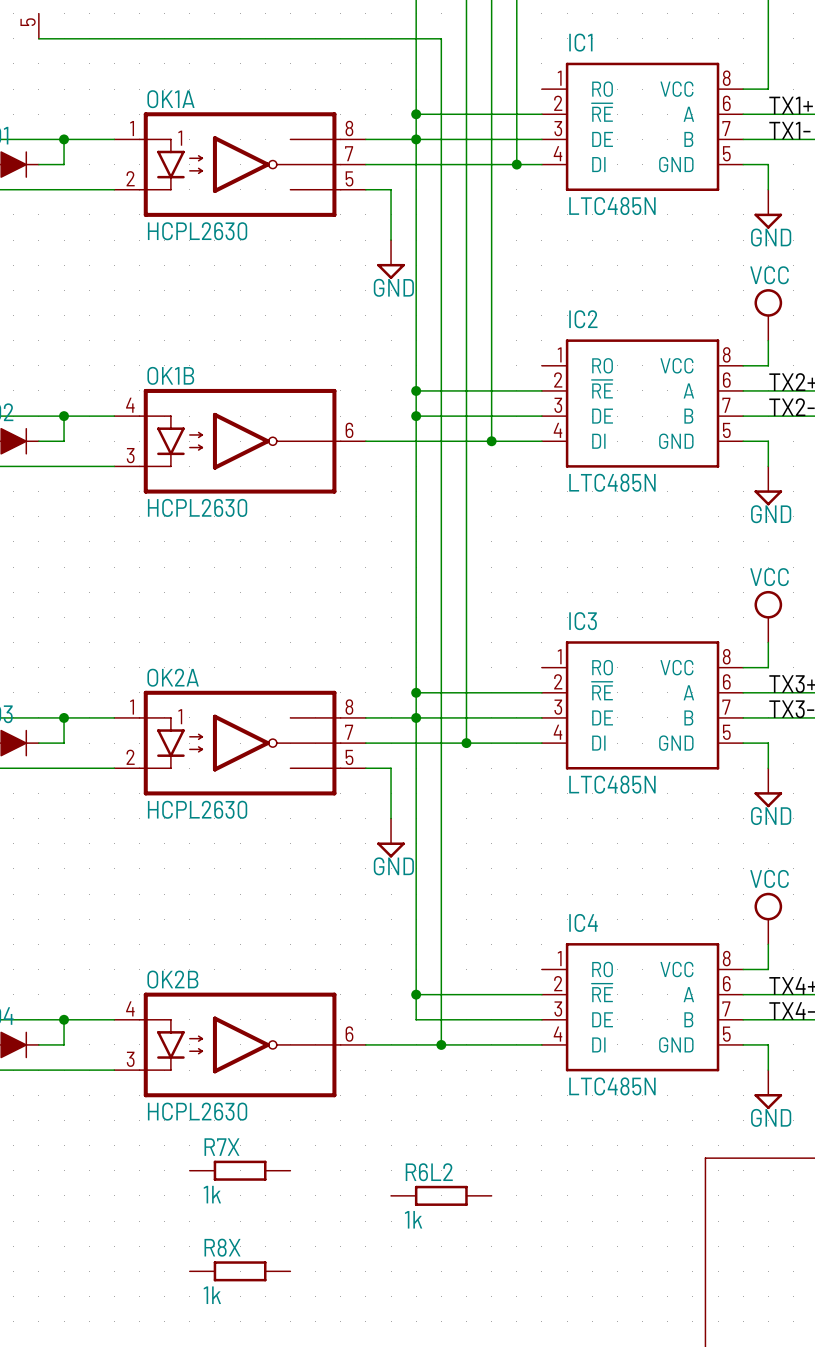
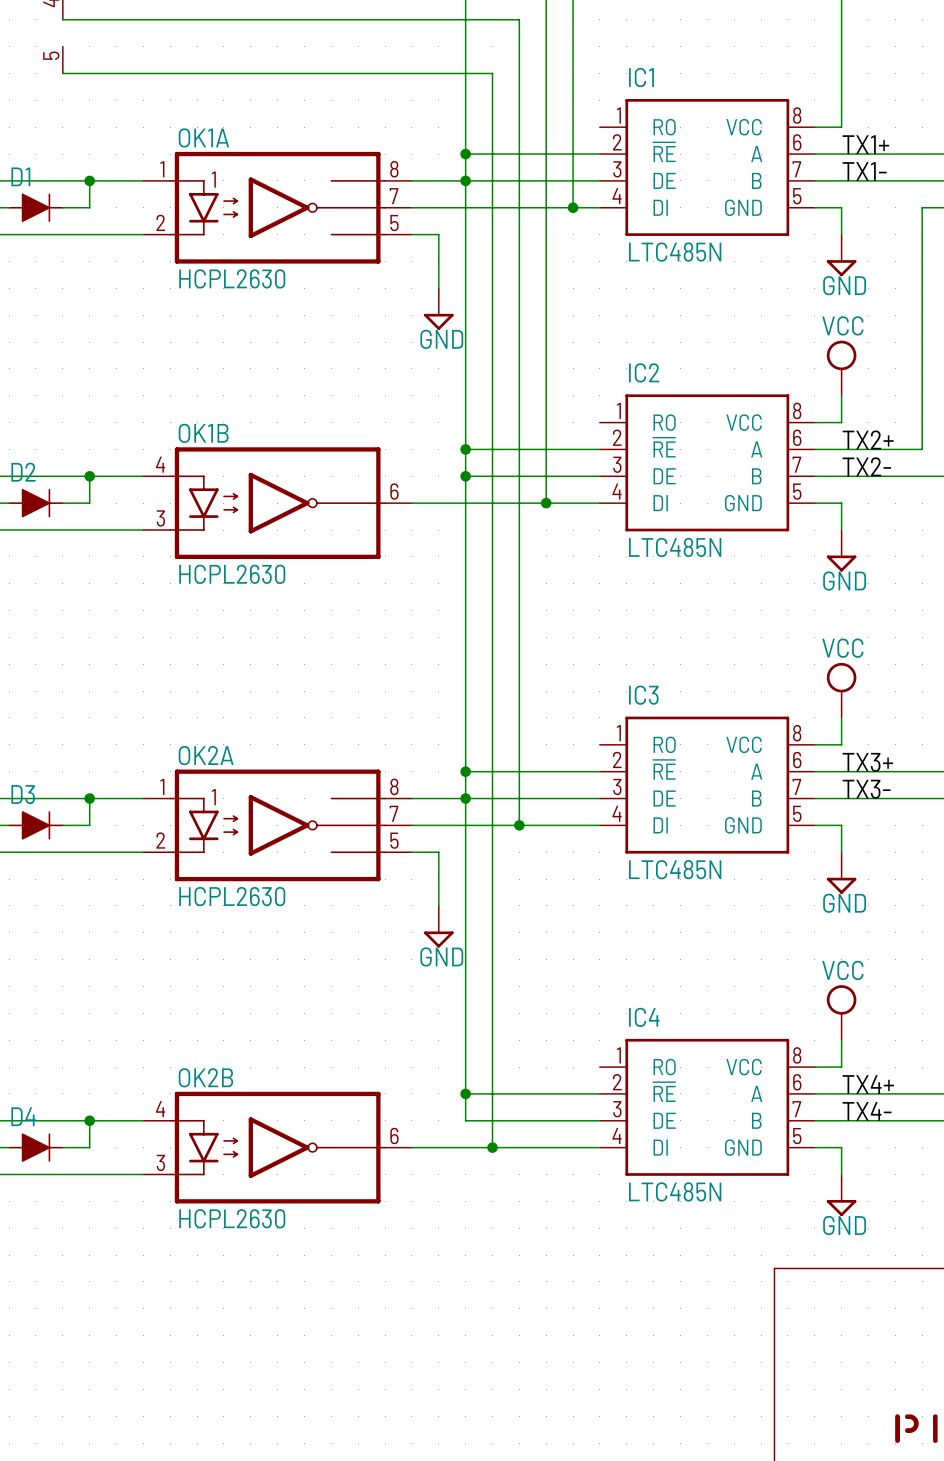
R7X: 1k (240, 1170) -> none
R6L2: 1k (441, 1195) -> none
R8X: 1k (240, 1271) -> none

